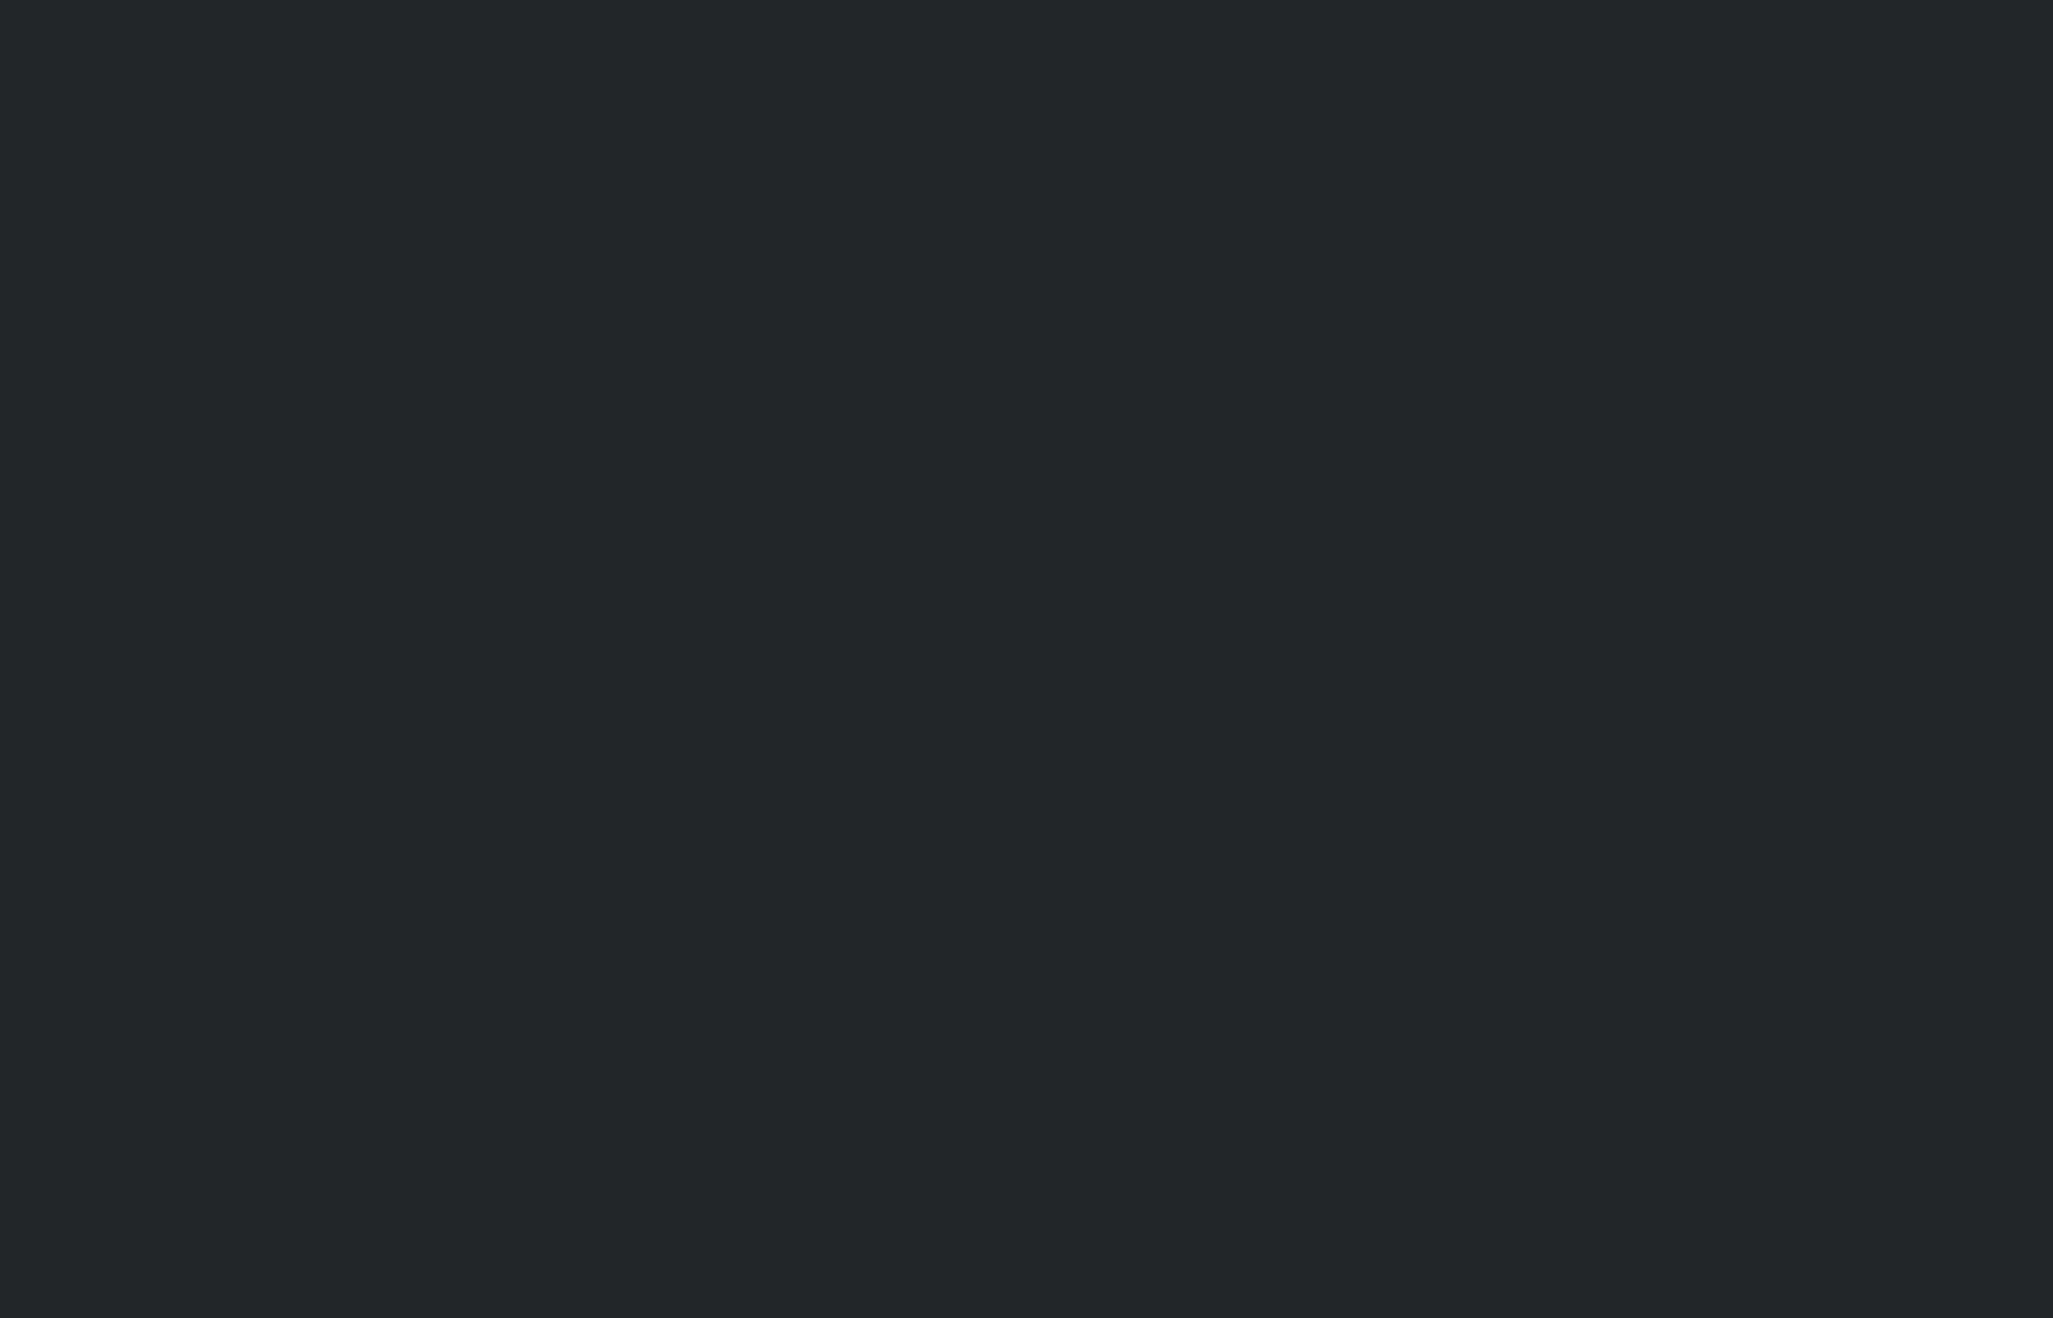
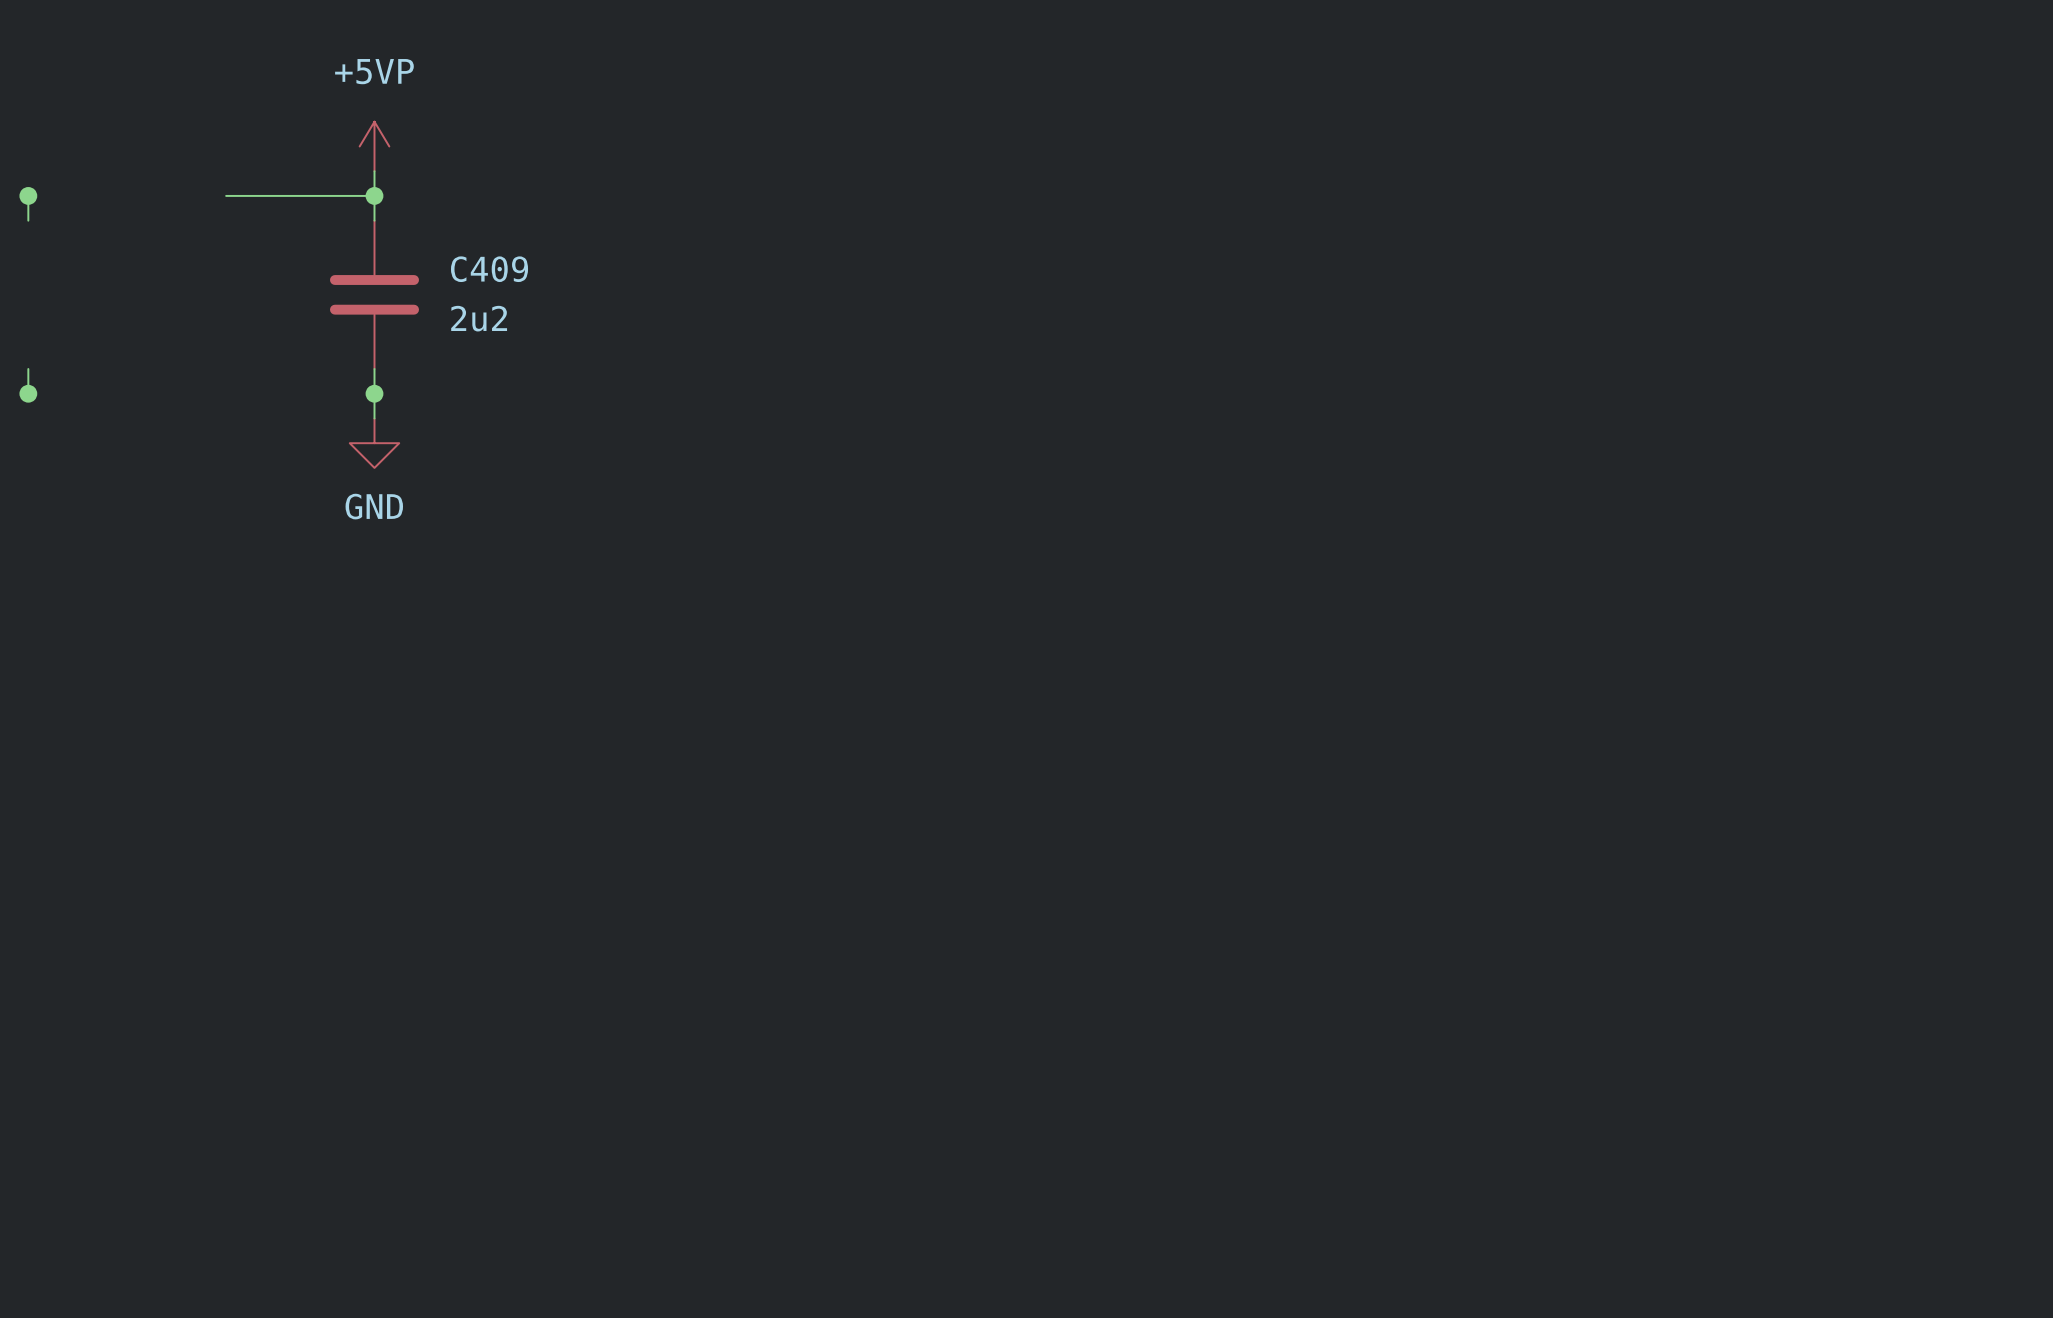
power symbol: none -> +5VP (374, 146)
wire: none -> (374, 171) (374, 220)
wire: none -> (28, 195) (28, 220)
junction: none -> (28, 195)
wire: none -> (226, 195) (374, 195)
junction: none -> (374, 195)
C409: none -> 2u2 (374, 294)
wire: none -> (28, 369) (28, 393)
wire: none -> (374, 369) (374, 418)
junction: none -> (28, 393)
junction: none -> (374, 393)
power symbol: none -> GND (374, 443)

